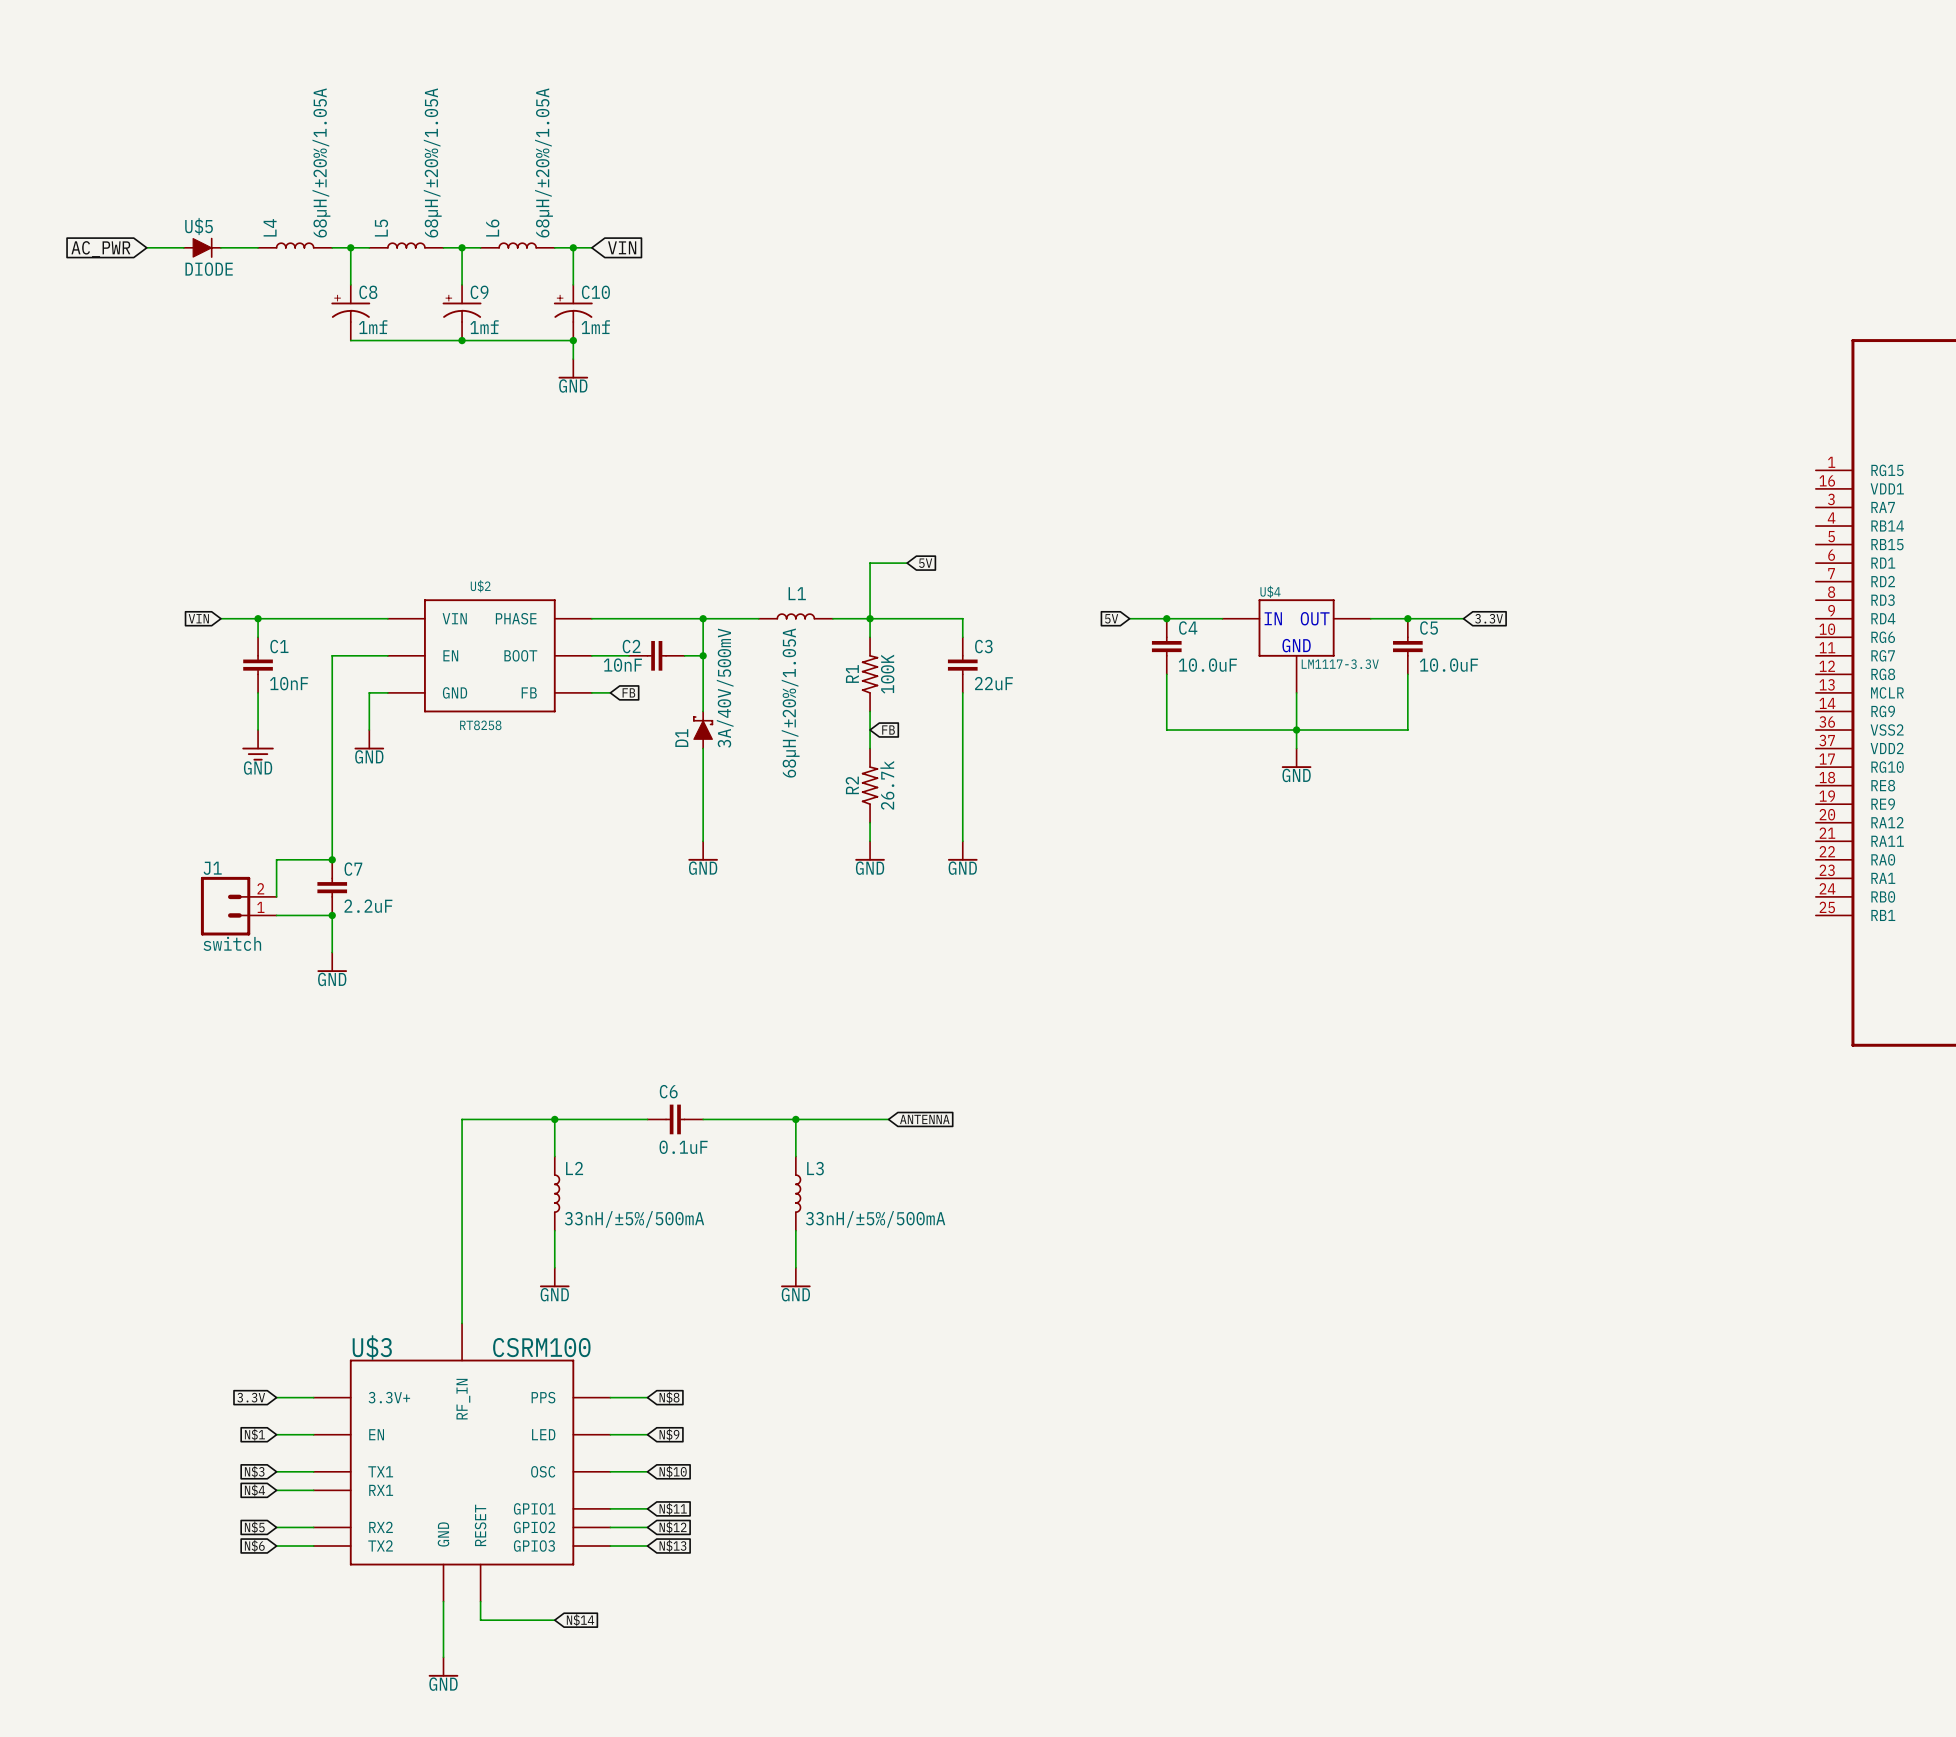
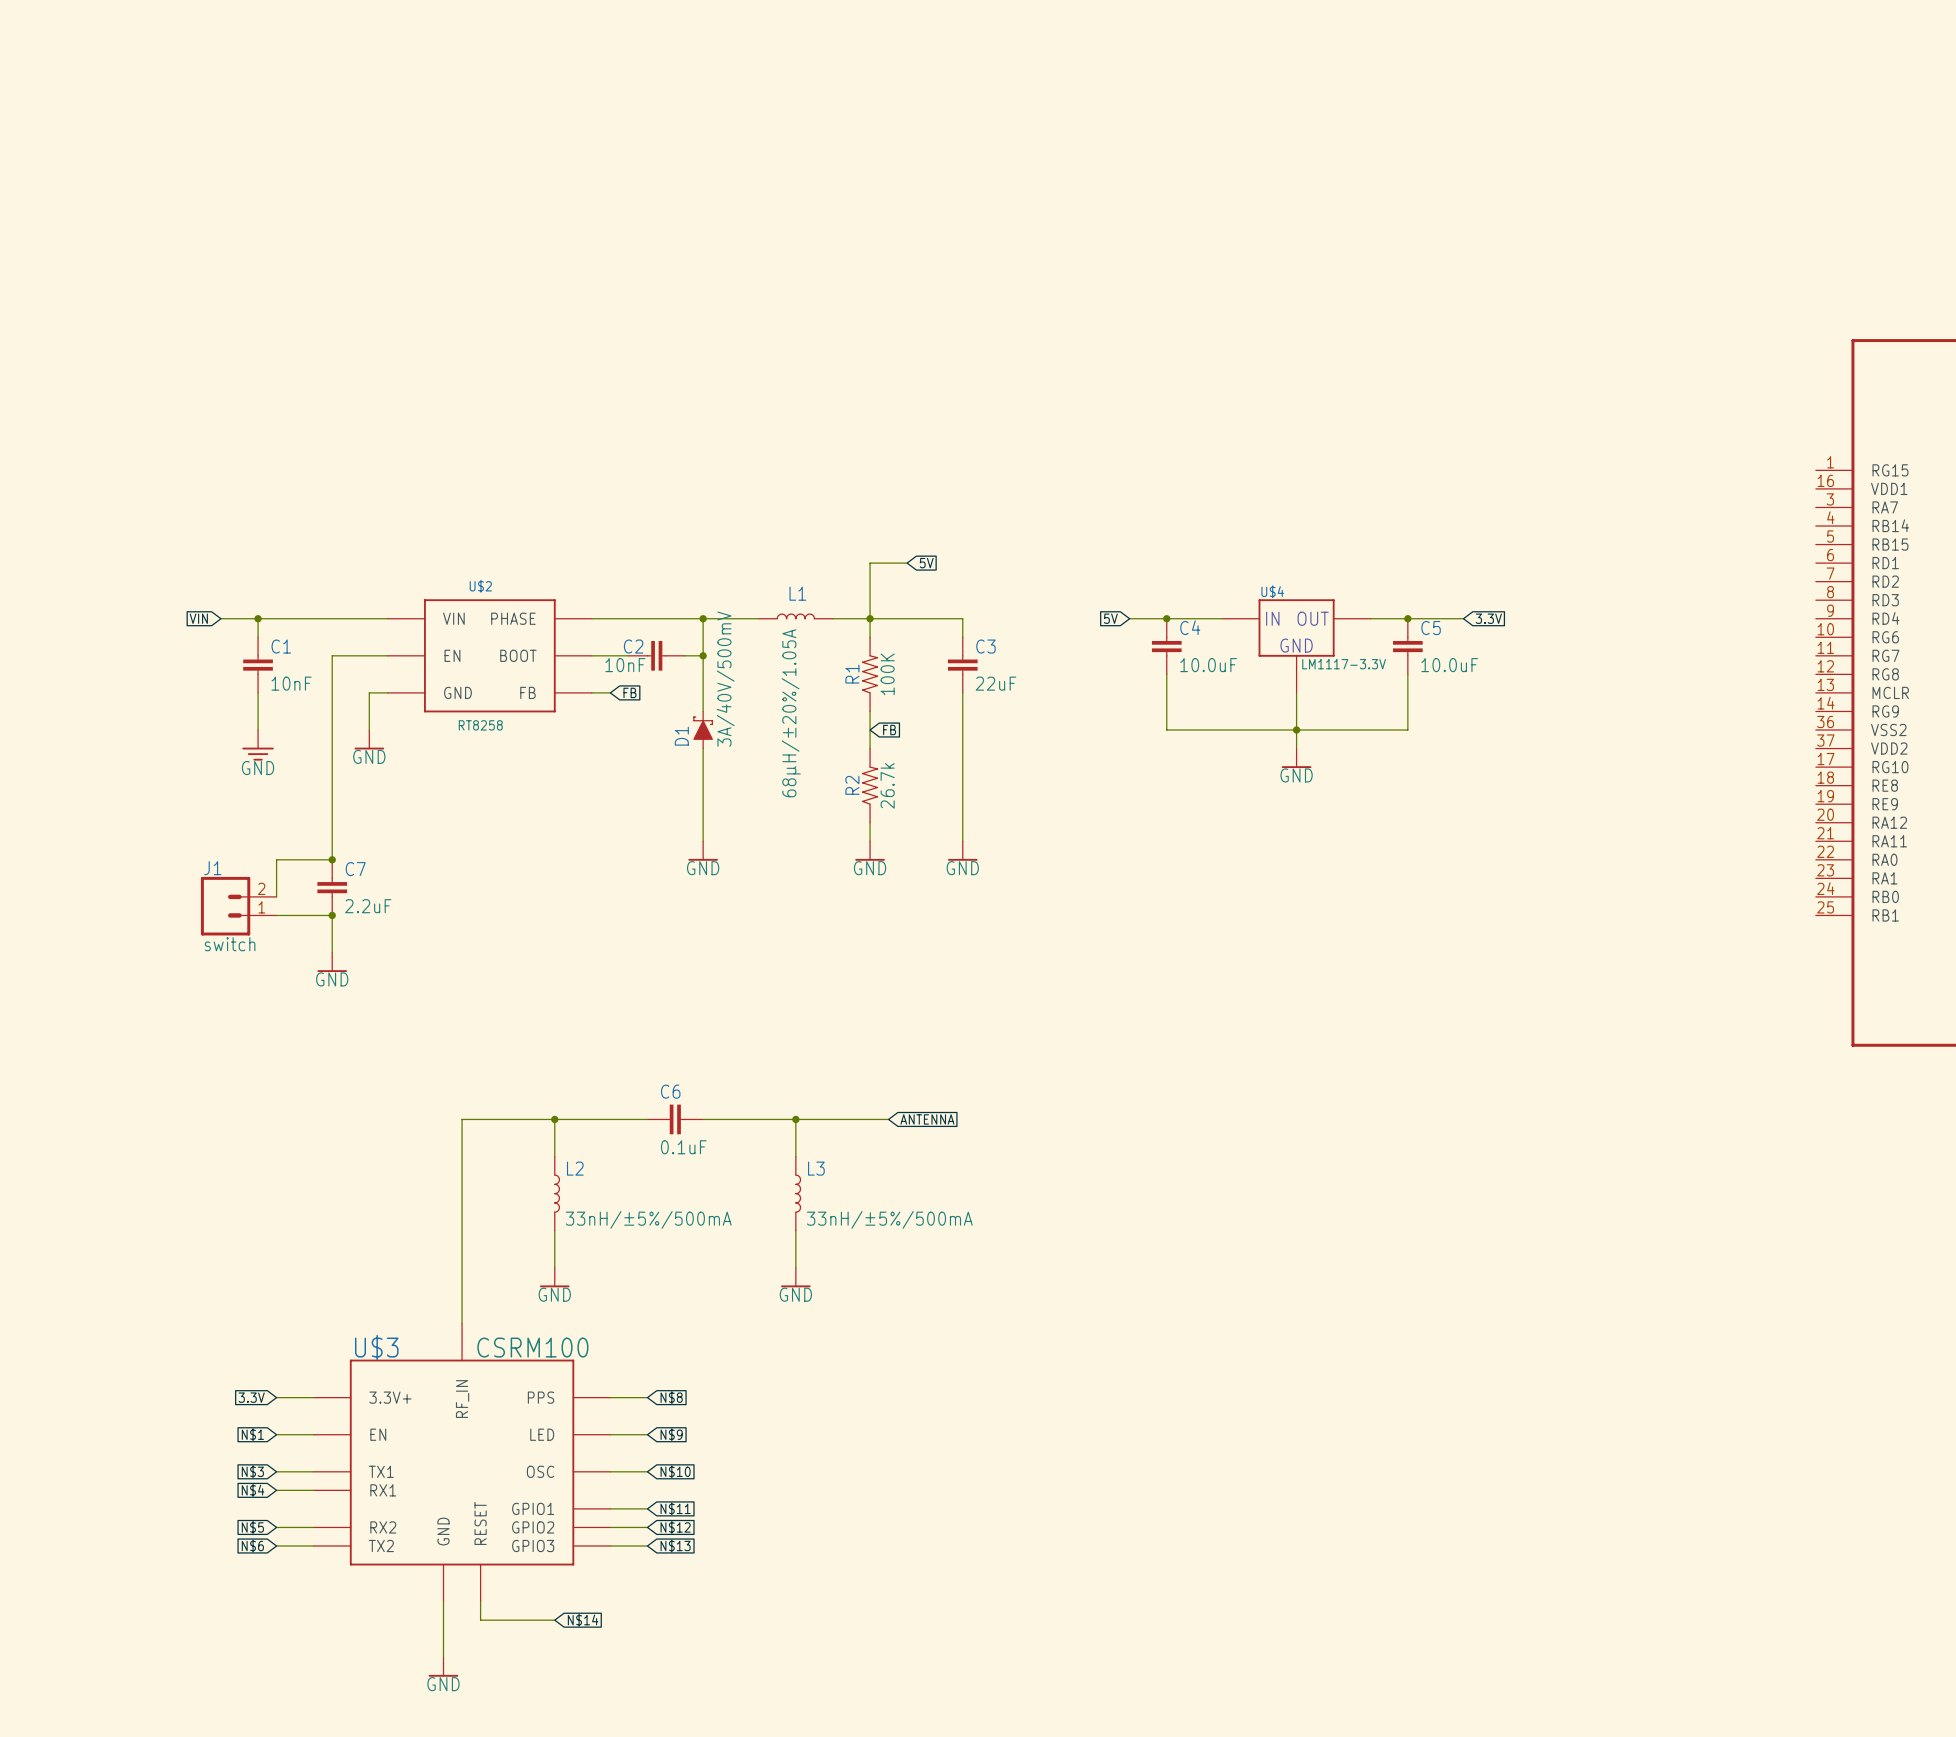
L4: 68µH/±20%/1.05A (295, 245) -> none
L5: 68µH/±20%/1.05A (406, 245) -> none
L6: 68µH/±20%/1.05A (517, 245) -> none
wire: (146, 247) (183, 247) -> none
U$5: DIODE (202, 247) -> none
wire: (220, 247) (258, 247) -> none
wire: (332, 247) (369, 247) -> none
wire: (350, 247) (350, 284) -> none
junction: (350, 247) -> none
wire: (443, 247) (480, 247) -> none
wire: (462, 247) (462, 284) -> none
junction: (462, 247) -> none
wire: (554, 247) (591, 247) -> none
wire: (573, 247) (573, 284) -> none
junction: (573, 247) -> none
global label: VIN (622, 247) -> none
global label: AC_PWR (100, 249) -> none
C8: 1mf (350, 312) -> none
C9: 1mf (462, 312) -> none
C10: 1mf (573, 312) -> none
wire: (350, 340) (573, 340) (573, 359) -> none
junction: (462, 340) -> none
junction: (573, 340) -> none
power symbol: GND (573, 368) -> none

